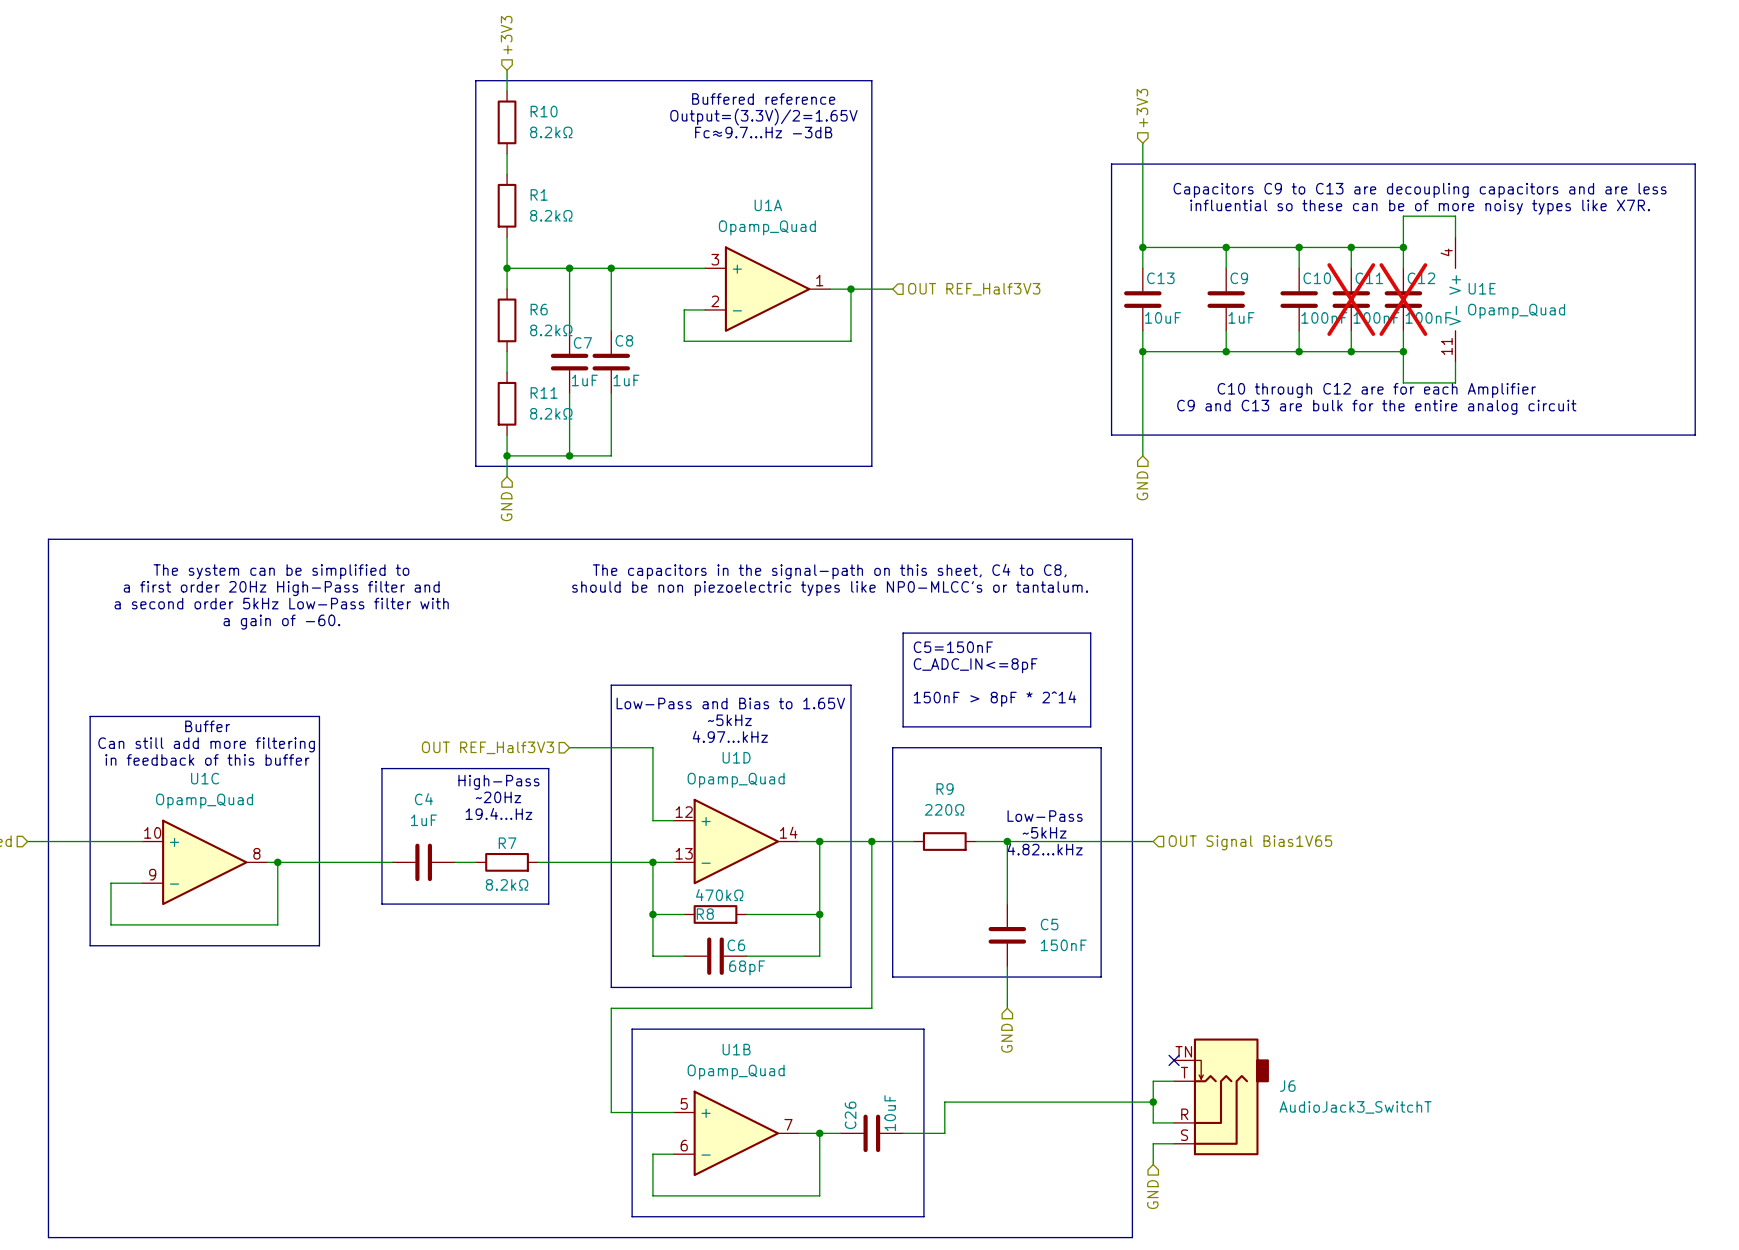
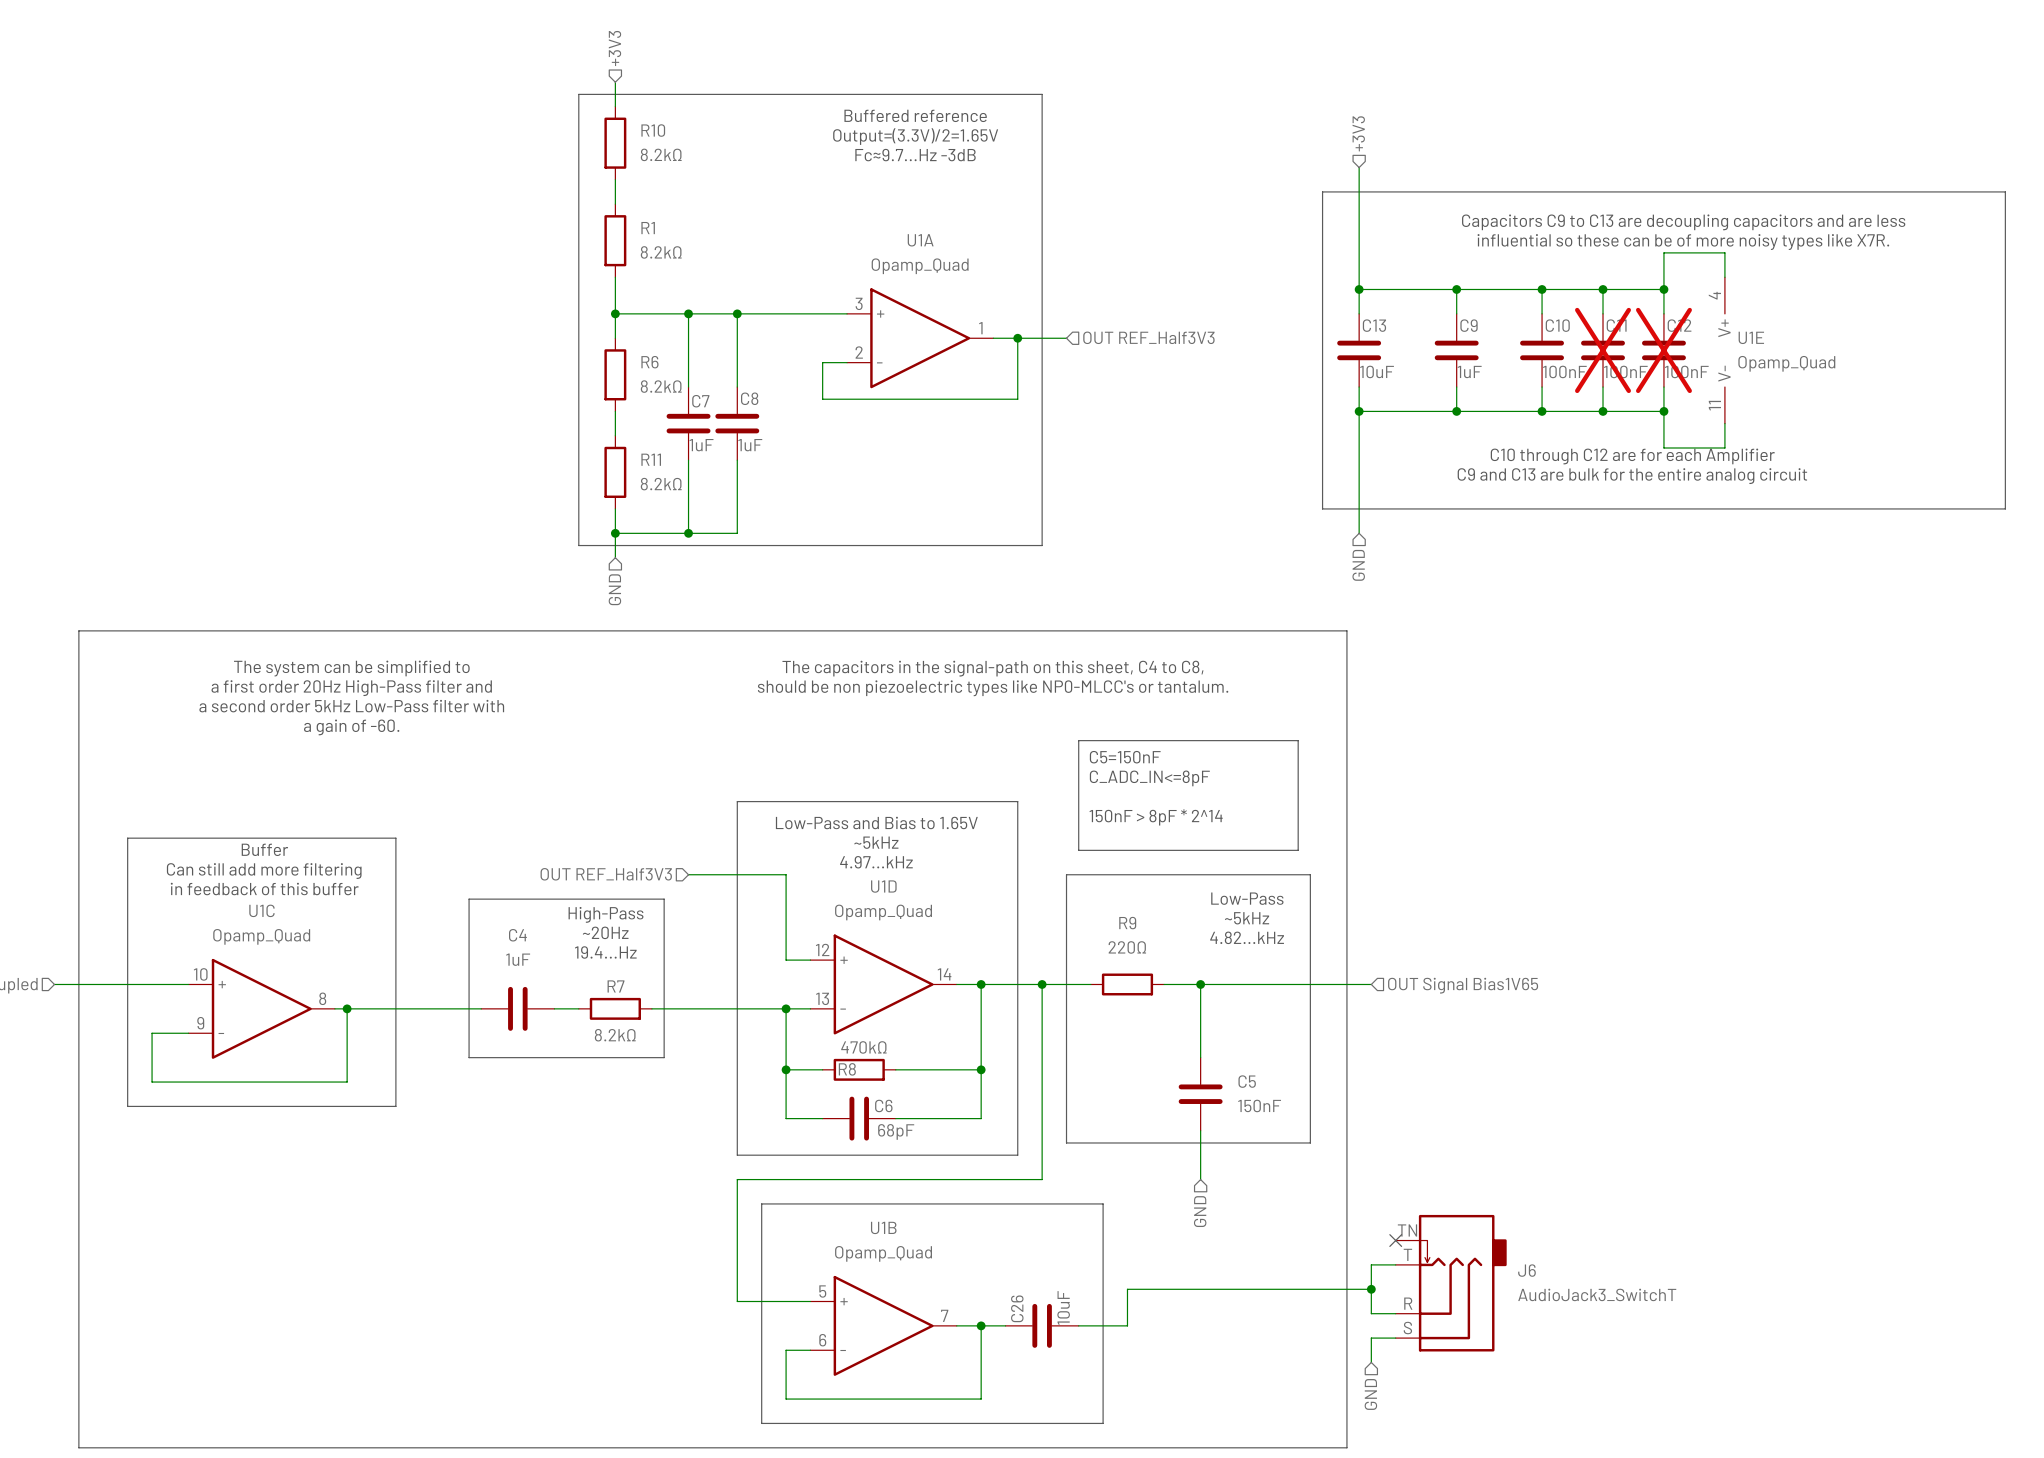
text position: Low-Pass (1045, 816) -> Low-Pass (1247, 898)
text position: ~5kHz (1044, 832) -> ~5kHz (1246, 918)
text position: 4.82...kHz (1045, 849) -> 4.82...kHz (1247, 937)

